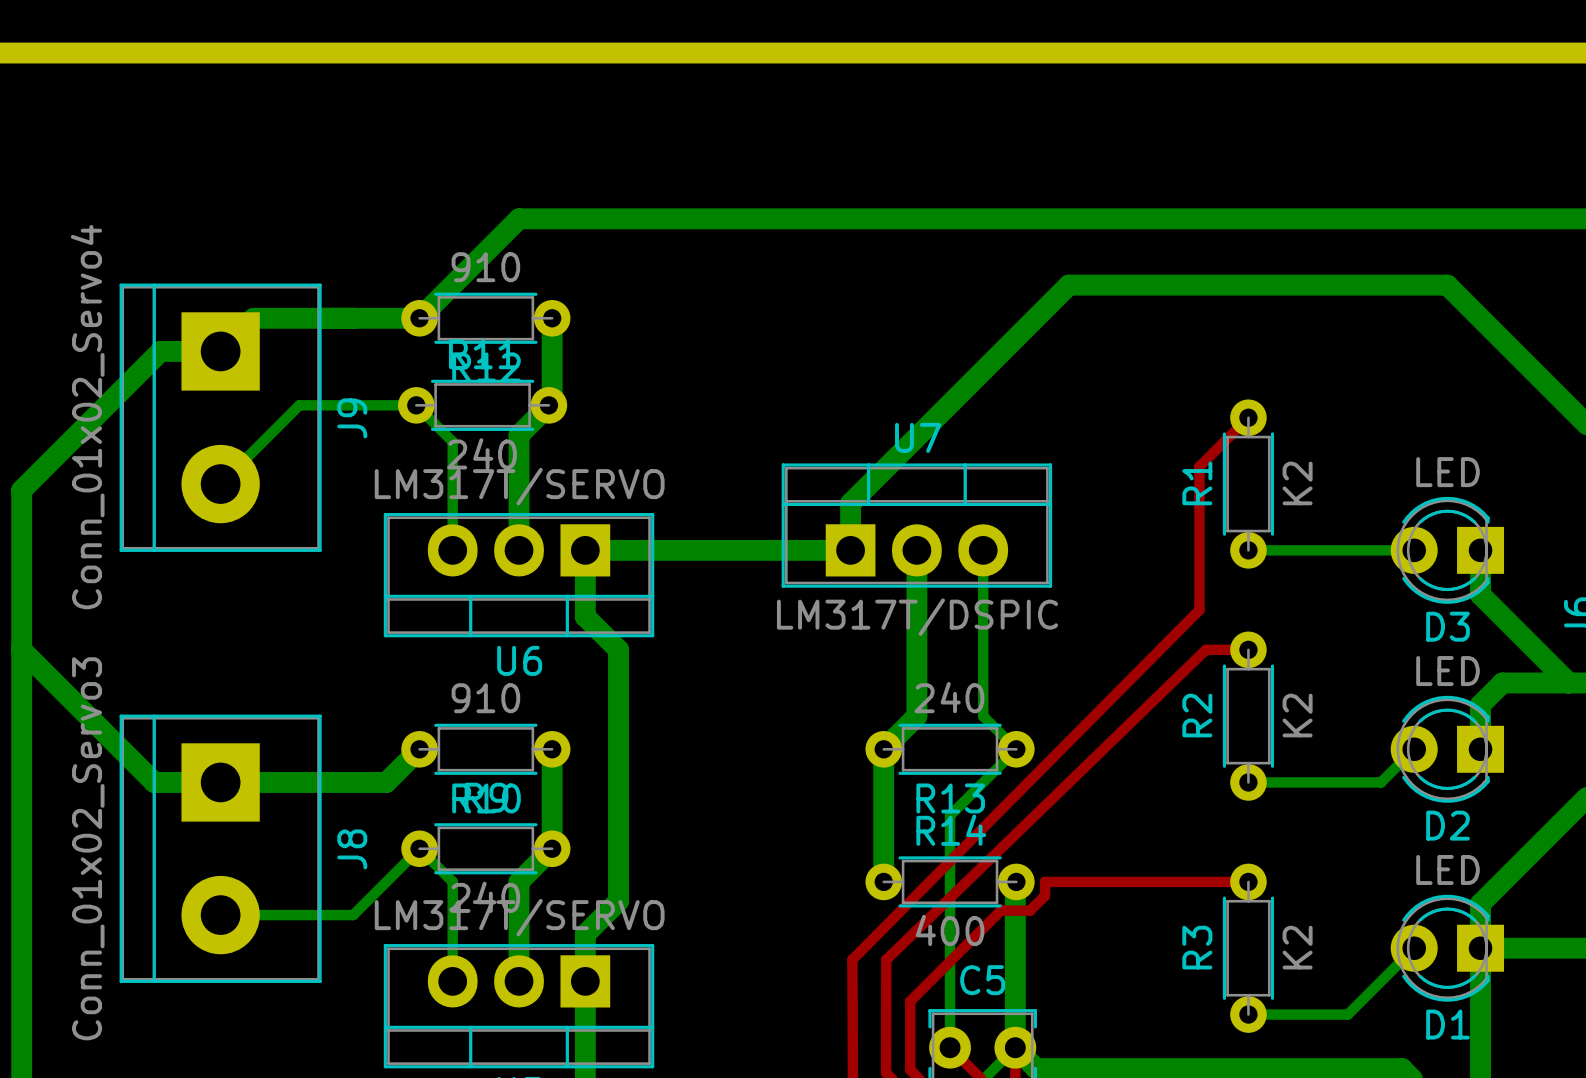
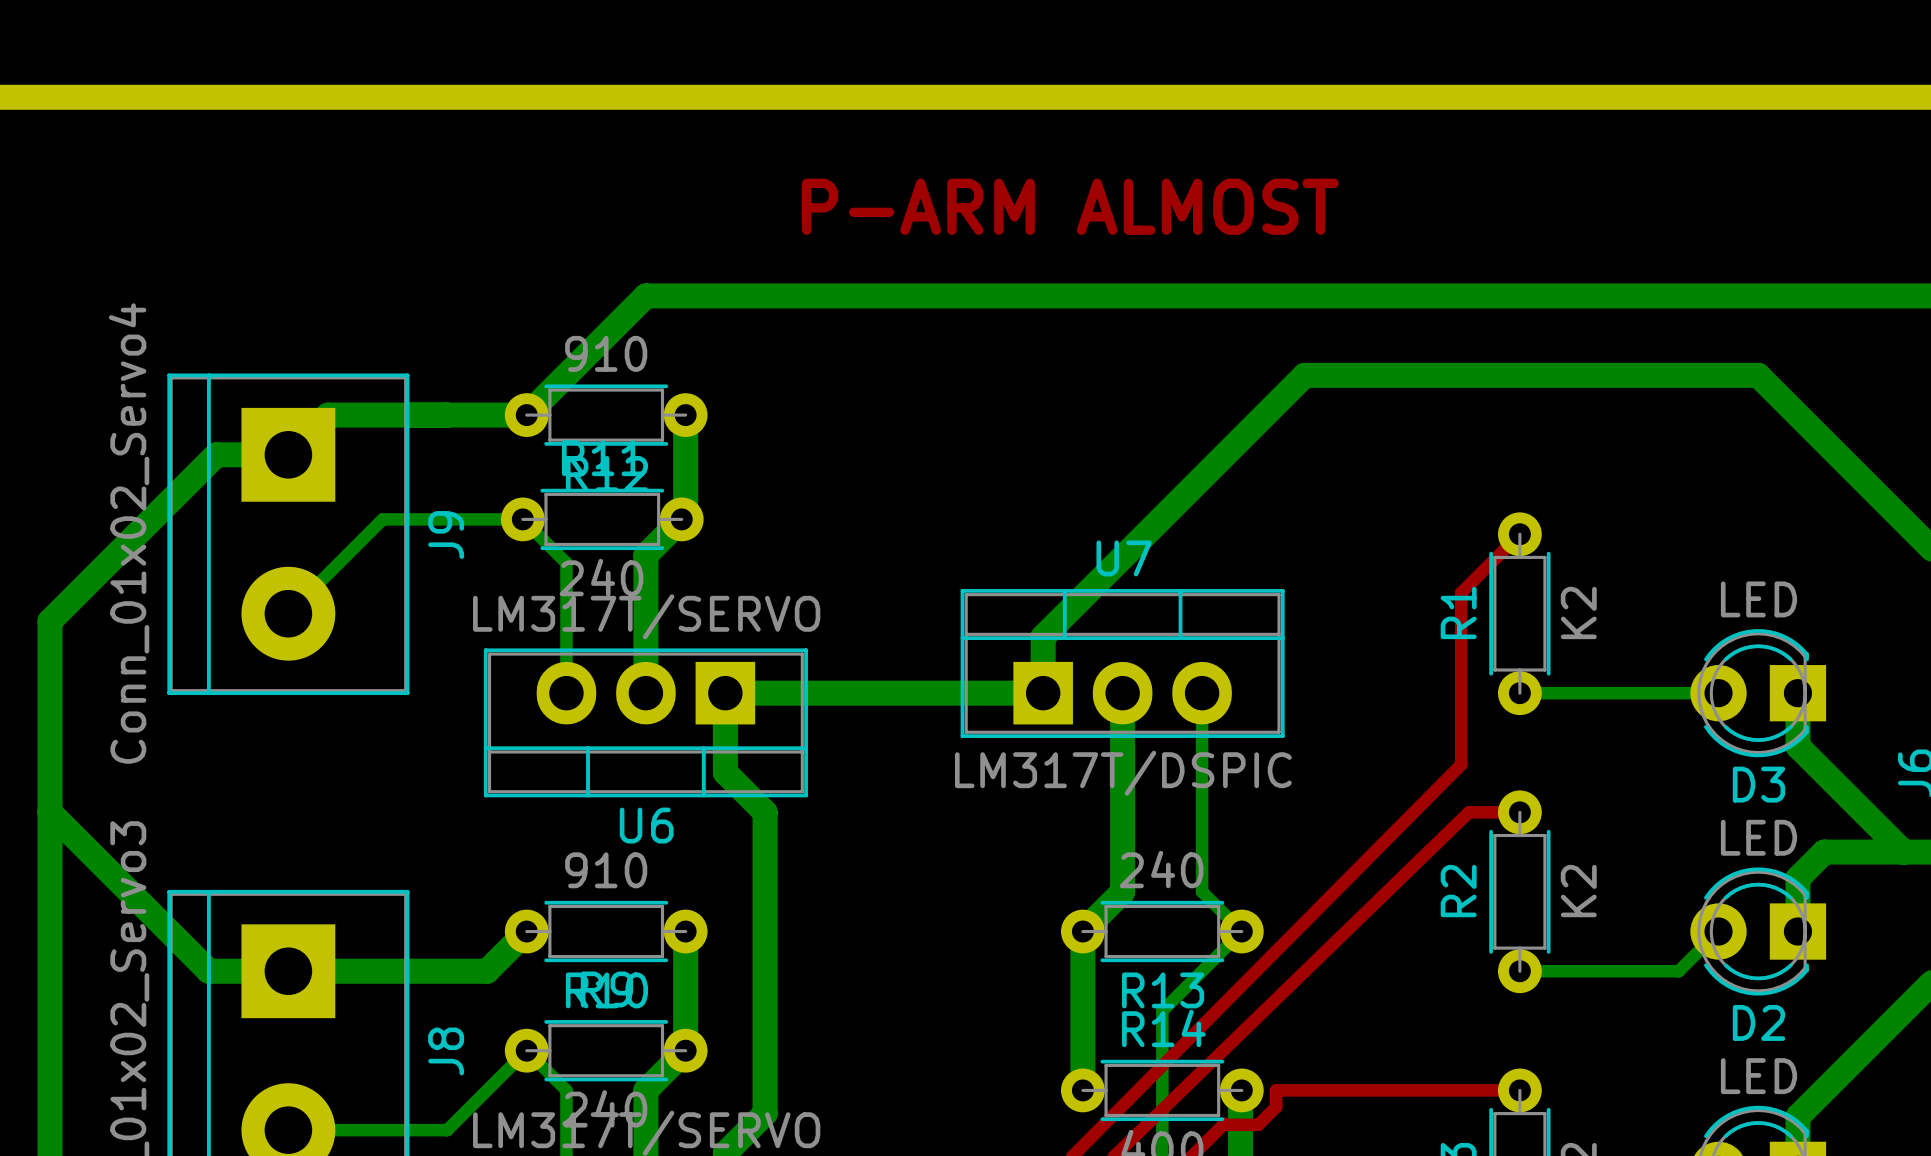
text: none -> P-ARM ALMOST (1070, 206)

